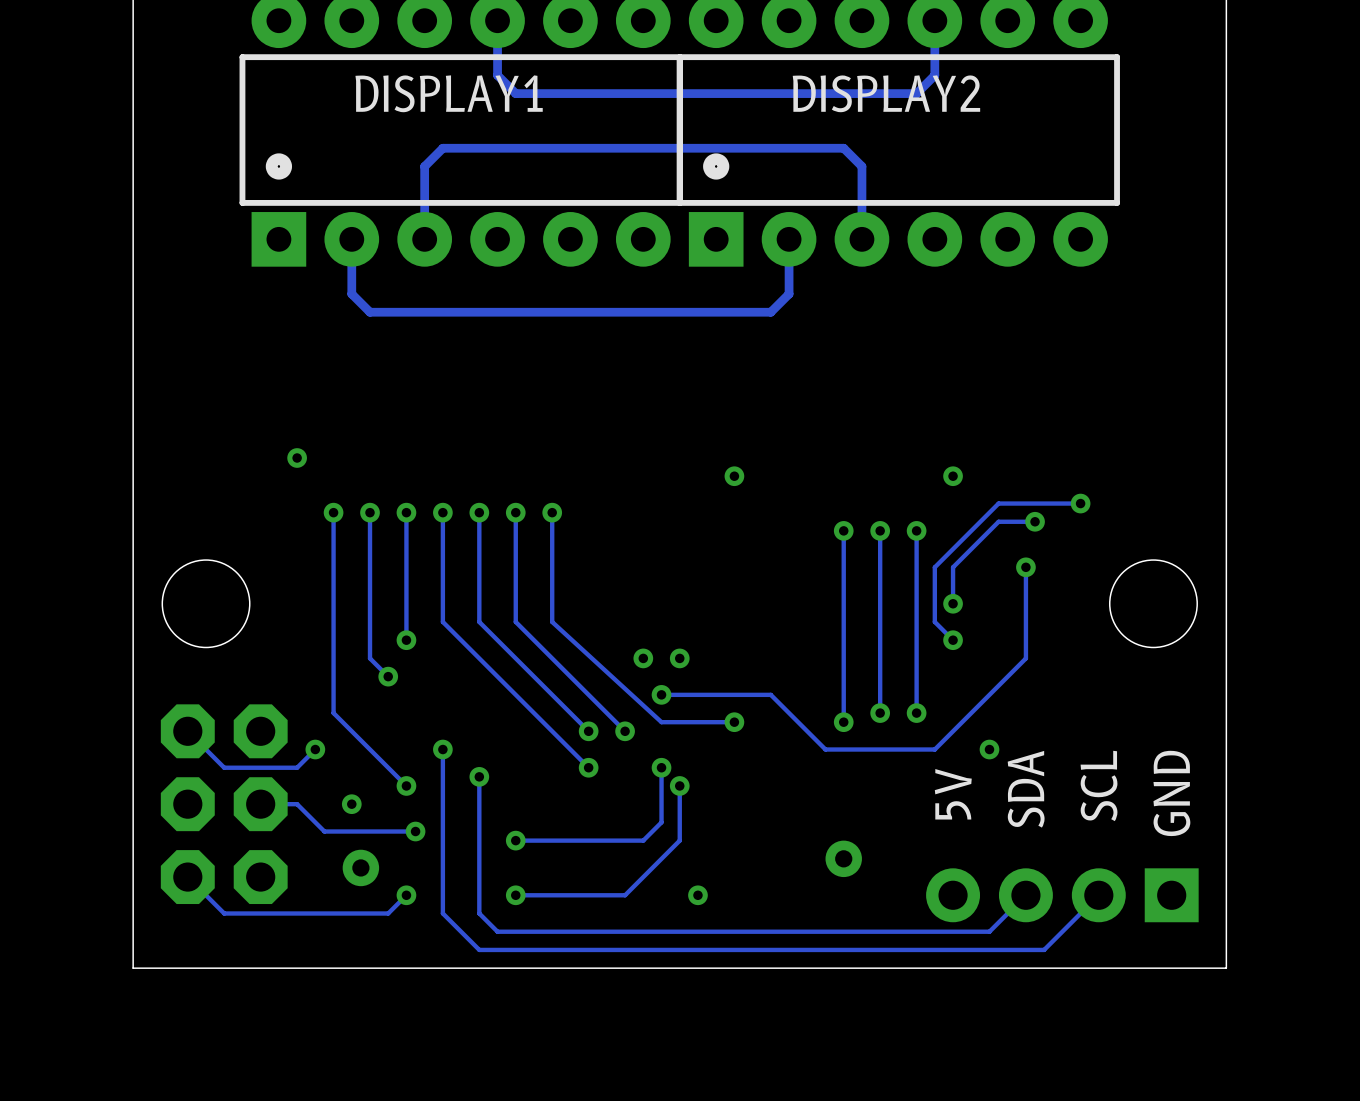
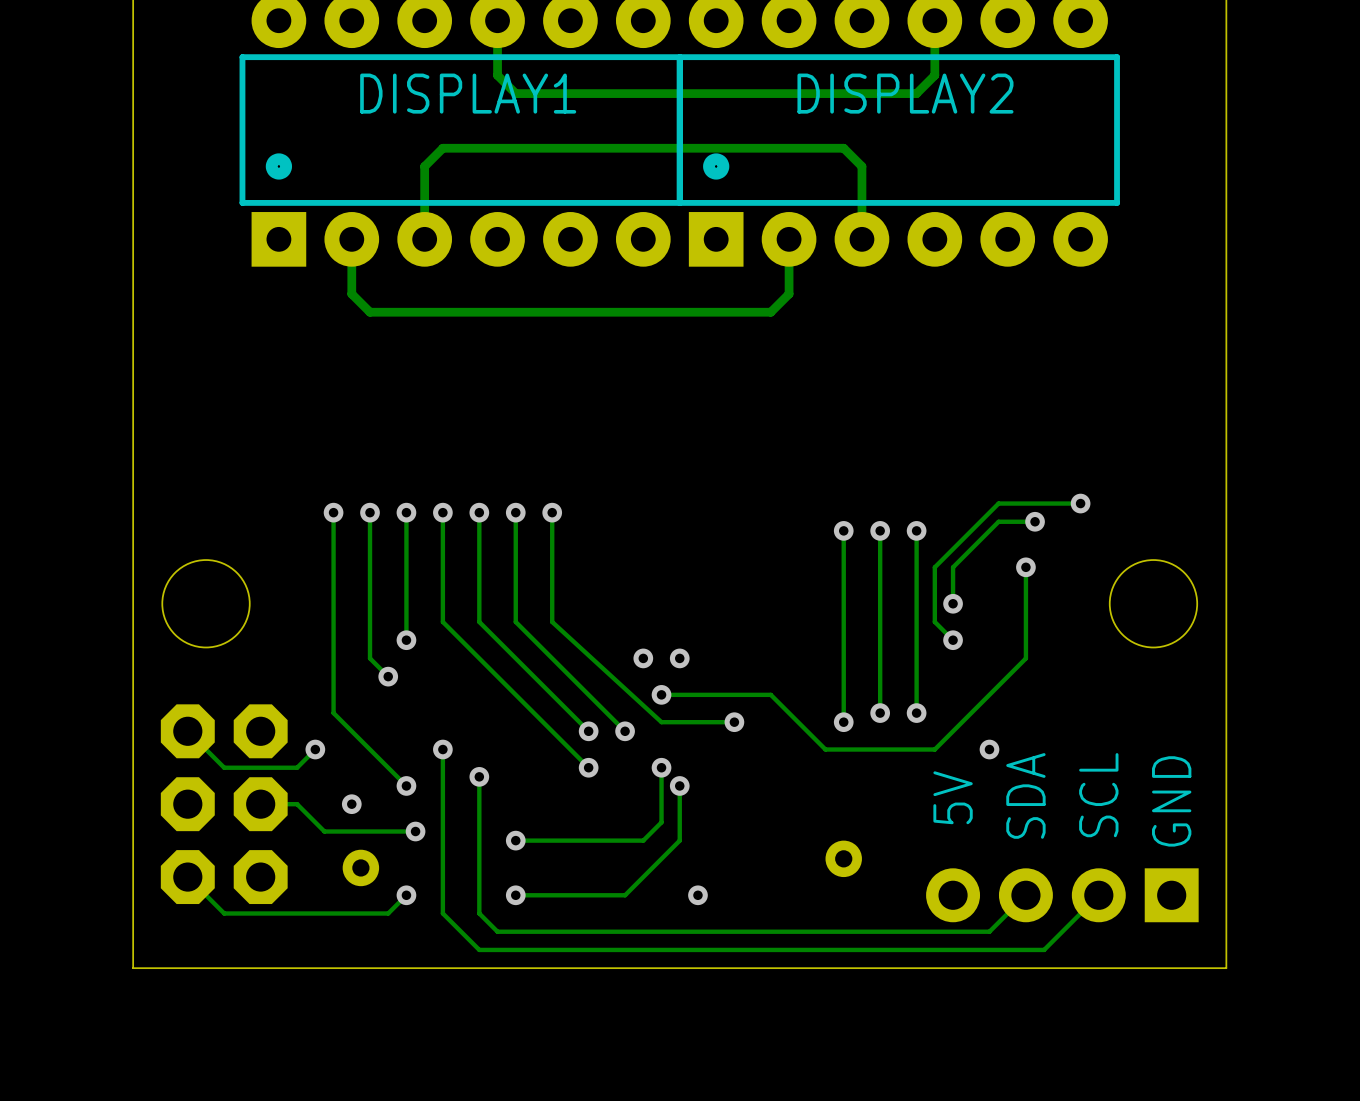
via: (297, 457) -> none
via: (734, 476) -> none
via: (953, 476) -> none

